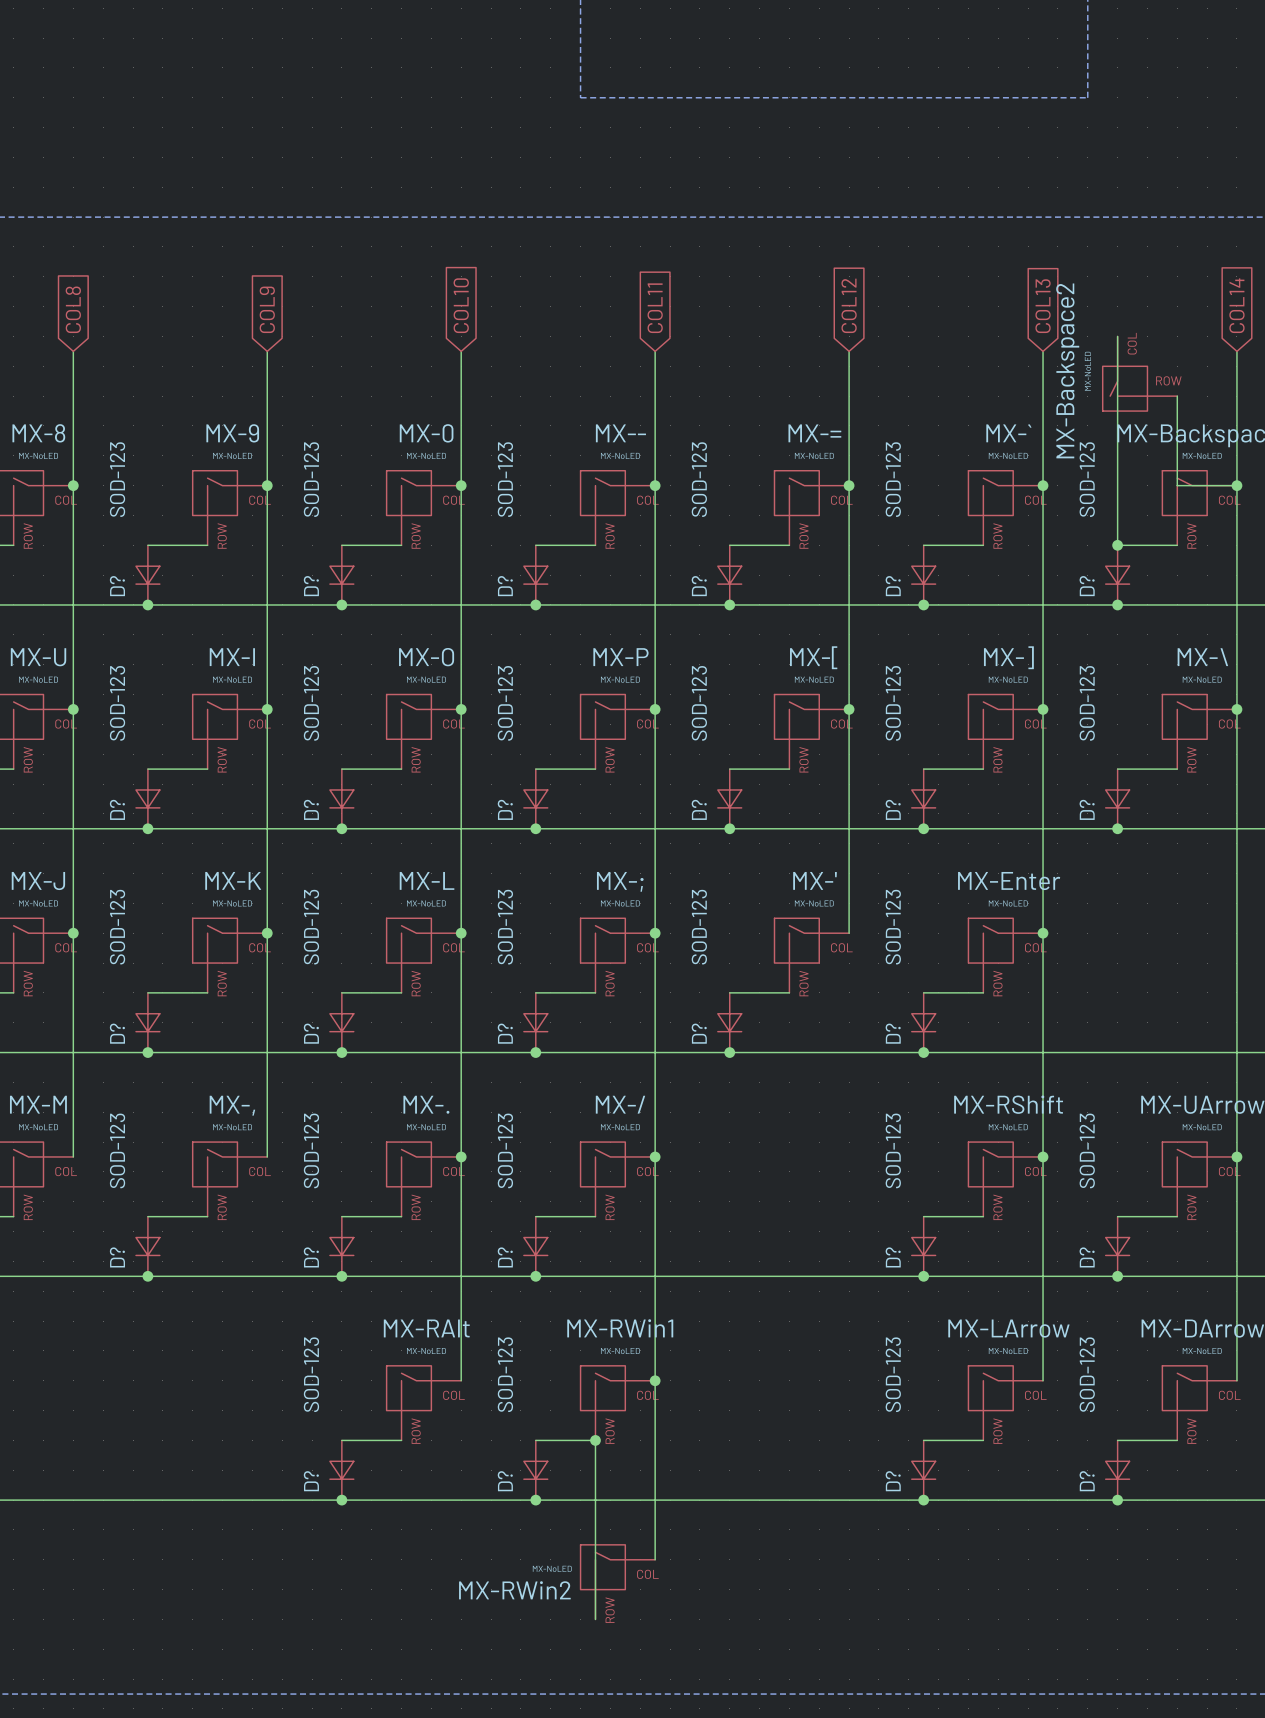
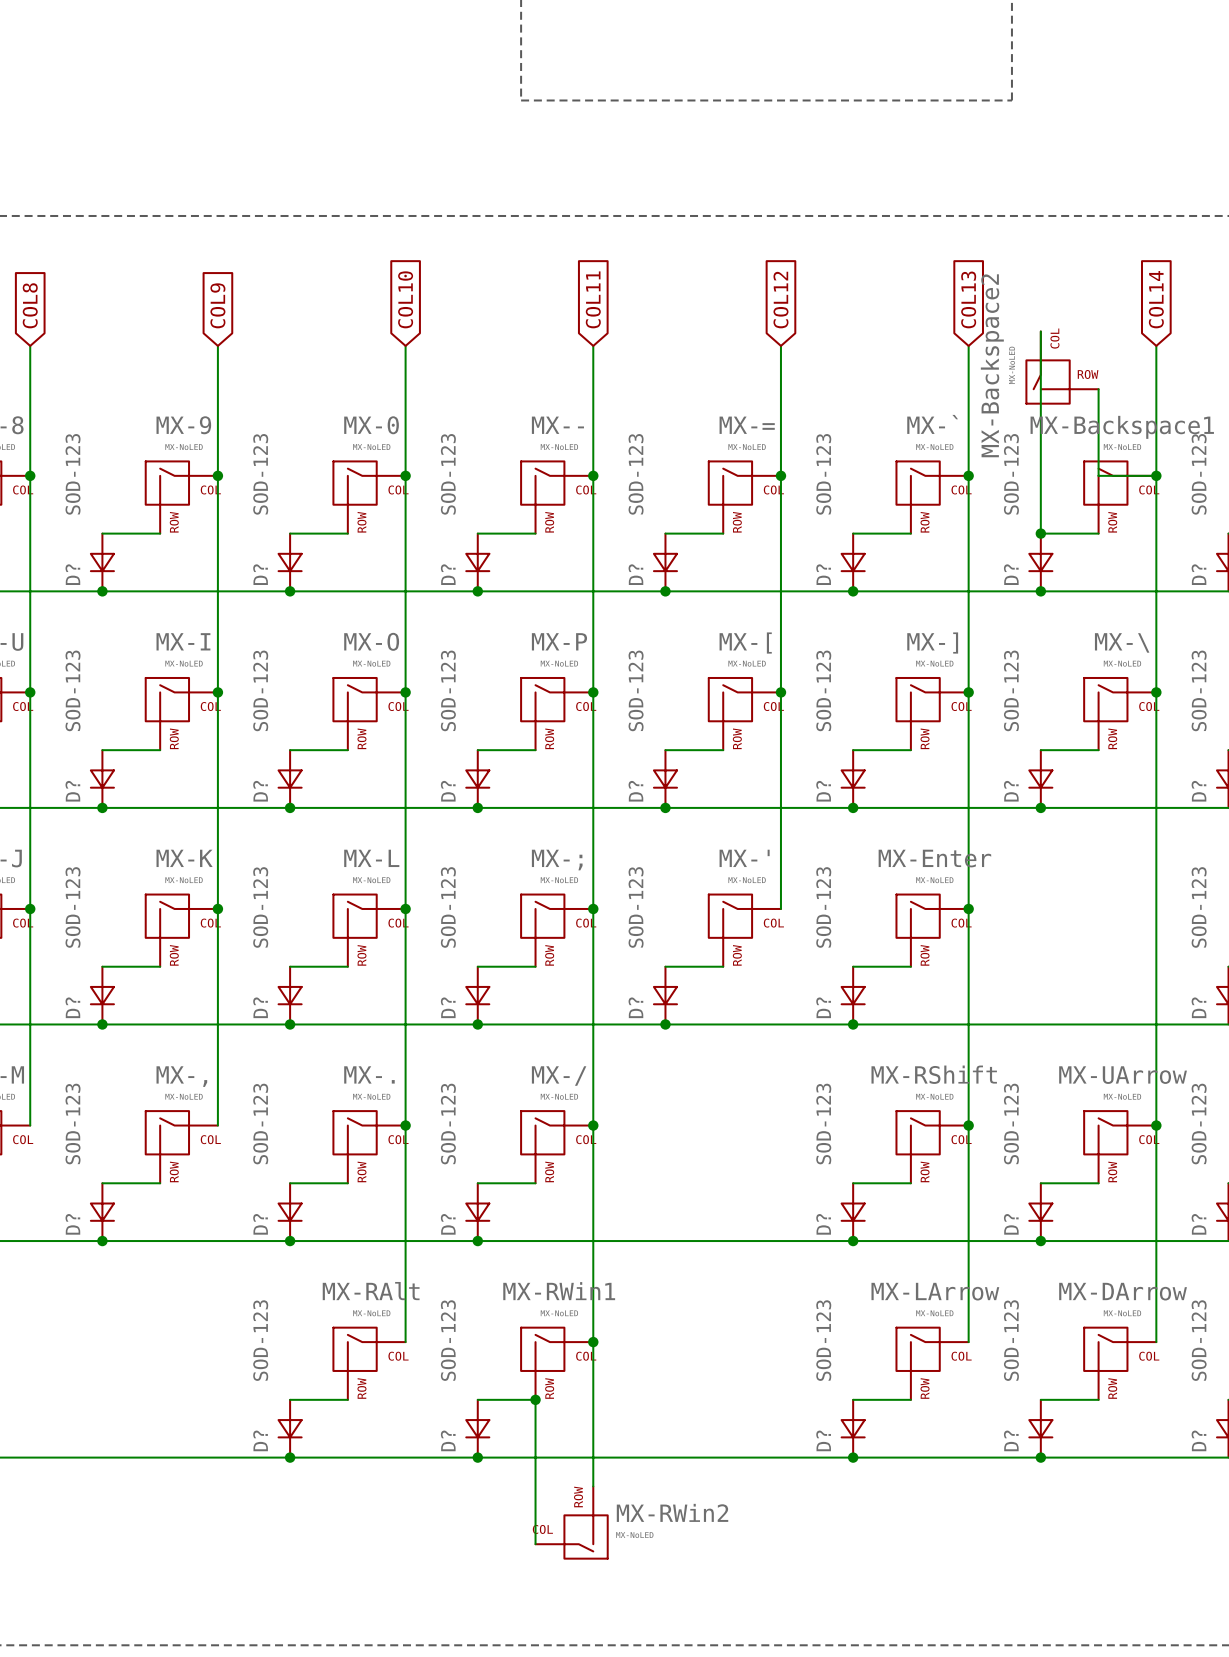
MX-RWin2 rotation: 0° (603, 1567) -> 180° (585, 1536)
wire: (595, 1589) (595, 1619) -> none

